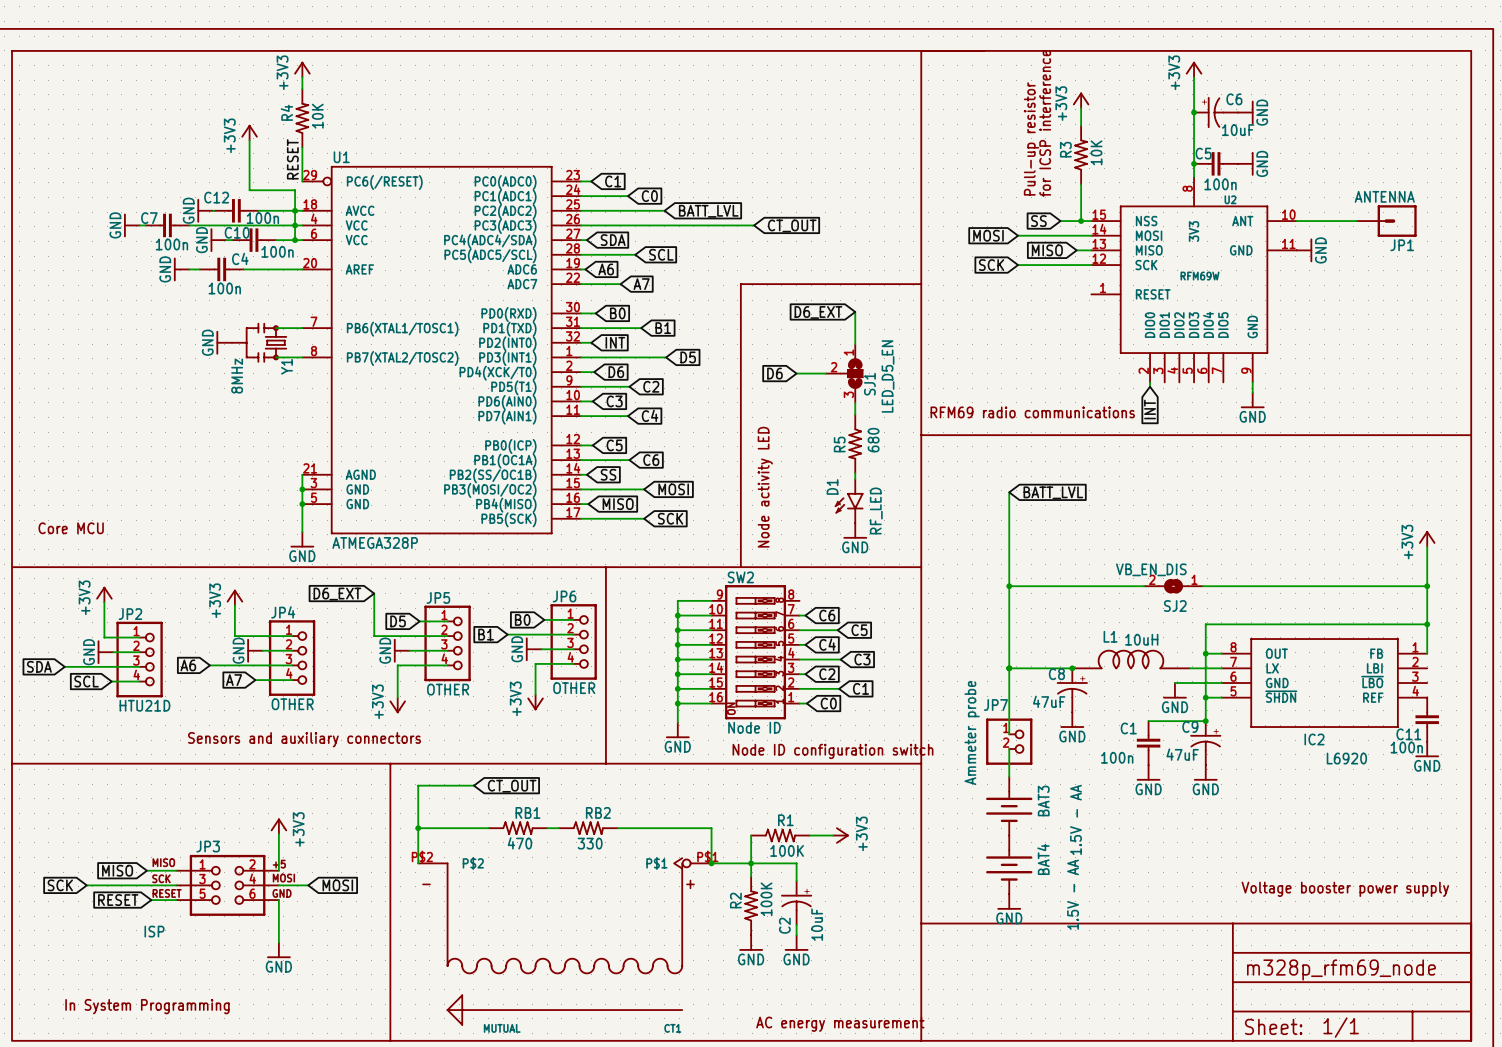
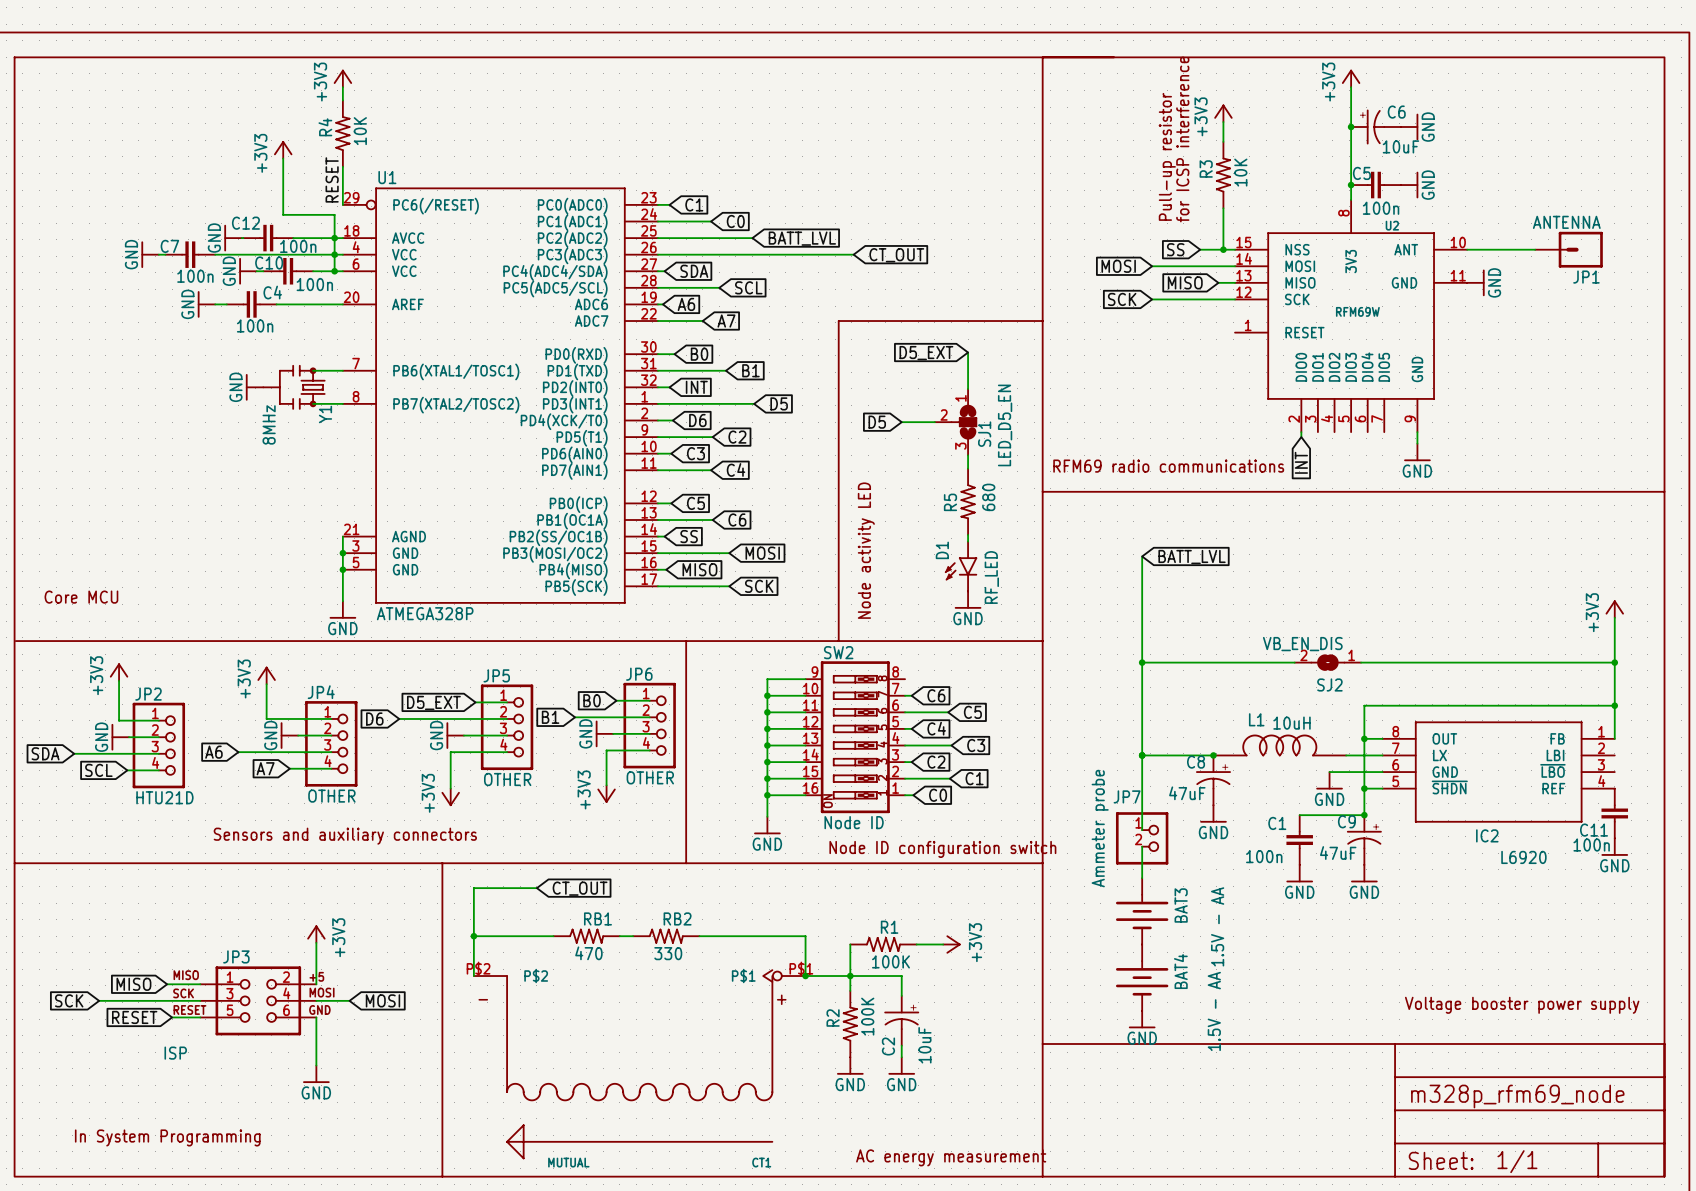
global label: D6_EXT (818, 312) -> D5_EXT (926, 353)
global label: D6 (774, 373) -> D5 (877, 422)
wire: (374, 593) (374, 636) -> (399, 718) (424, 718)
global label: D6_EXT (337, 594) -> none
global label: D5 (398, 621) -> D5_EXT (433, 702)
global label: none -> D6 (374, 718)

